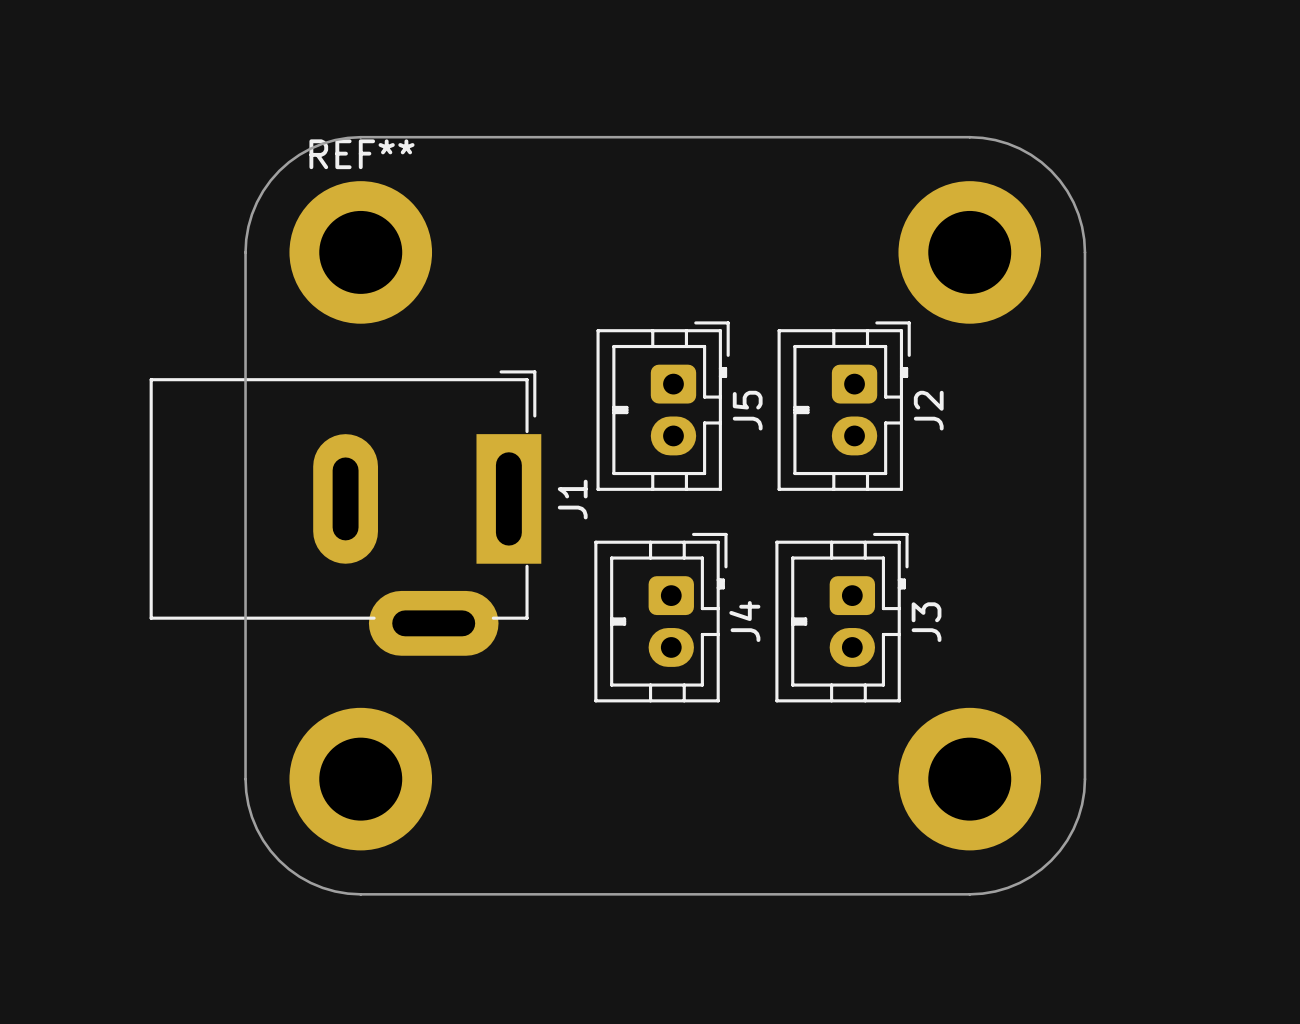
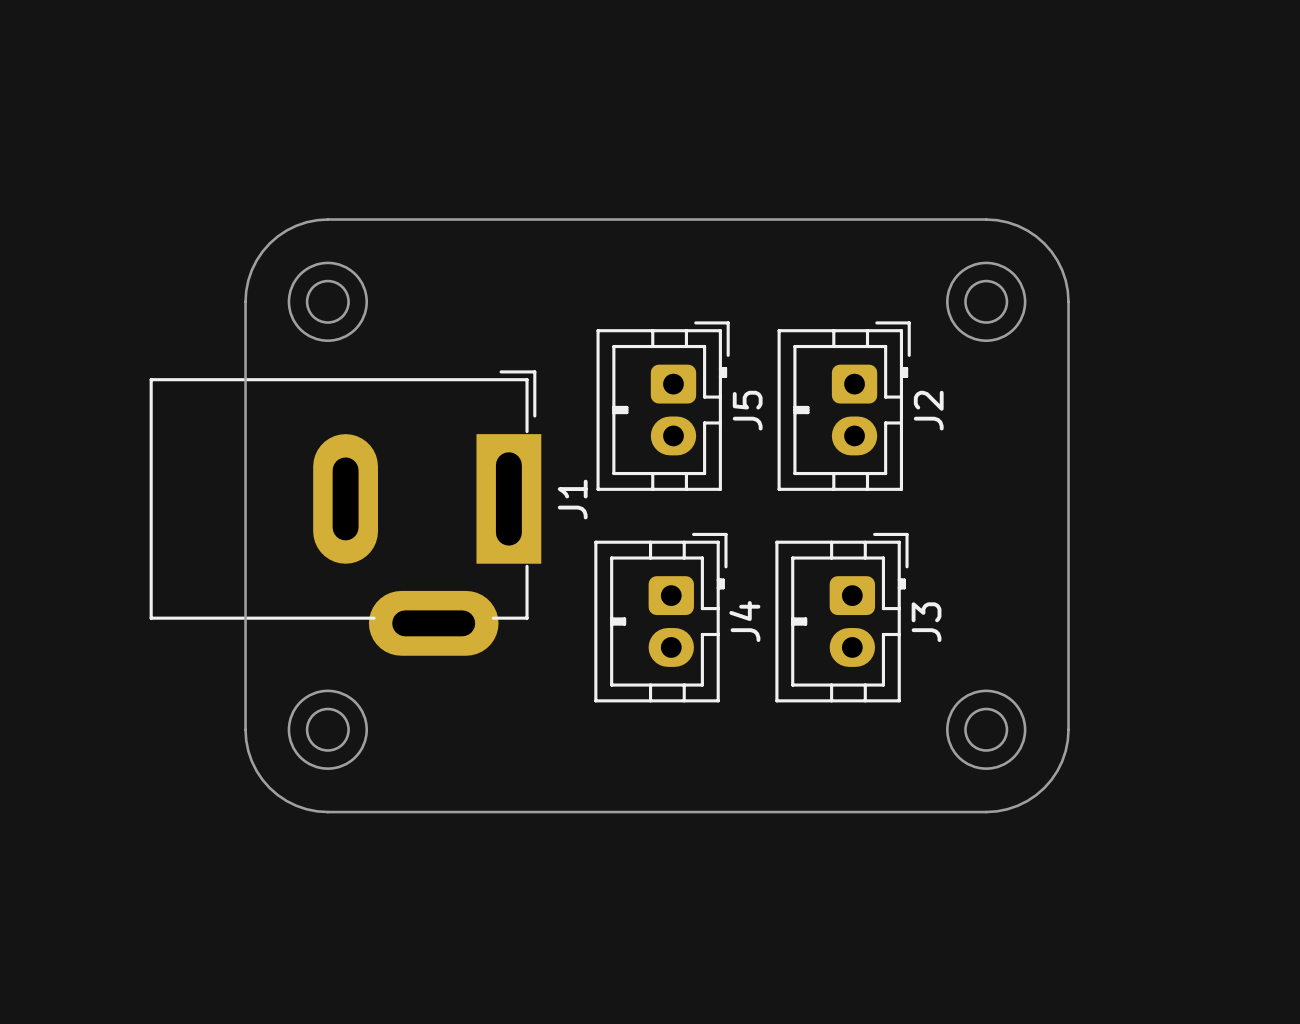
REF**: (360, 252) -> none
part: (969, 252) -> none
round board edge: none -> [287, 261, 369, 342]
round board edge: none -> [946, 261, 1027, 342]
round board edge: none -> [305, 279, 350, 324]
round board edge: none -> [964, 279, 1009, 324]
board edge: (245, 301) (246, 239) (252, 214) (263, 191) (279, 170) (299, 154) (322, 143) (347, 137) (982, 137) (1019, 148) (1051, 170) (1073, 202) (1084, 239) (1084, 792) (1078, 817) (1067, 840) (1051, 860) (1031, 876) (995, 891) (969, 894) (360, 894) (335, 891) (299, 876) (279, 860) (263, 840) (252, 817) (246, 792) (245, 729) -> (245, 301) (251, 270) (269, 243) (296, 225) (327, 219) (996, 220) (1017, 225) (1044, 243) (1062, 270) (1068, 301) (1067, 740) (1062, 761) (1051, 779) (1027, 801) (1007, 809) (986, 812) (317, 811) (286, 801) (262, 779) (248, 751) (245, 729)
round board edge: none -> [287, 689, 369, 770]
round board edge: none -> [946, 689, 1027, 770]
round board edge: none -> [305, 707, 350, 752]
round board edge: none -> [964, 707, 1009, 752]
part: (360, 779) -> none
part: (969, 779) -> none

